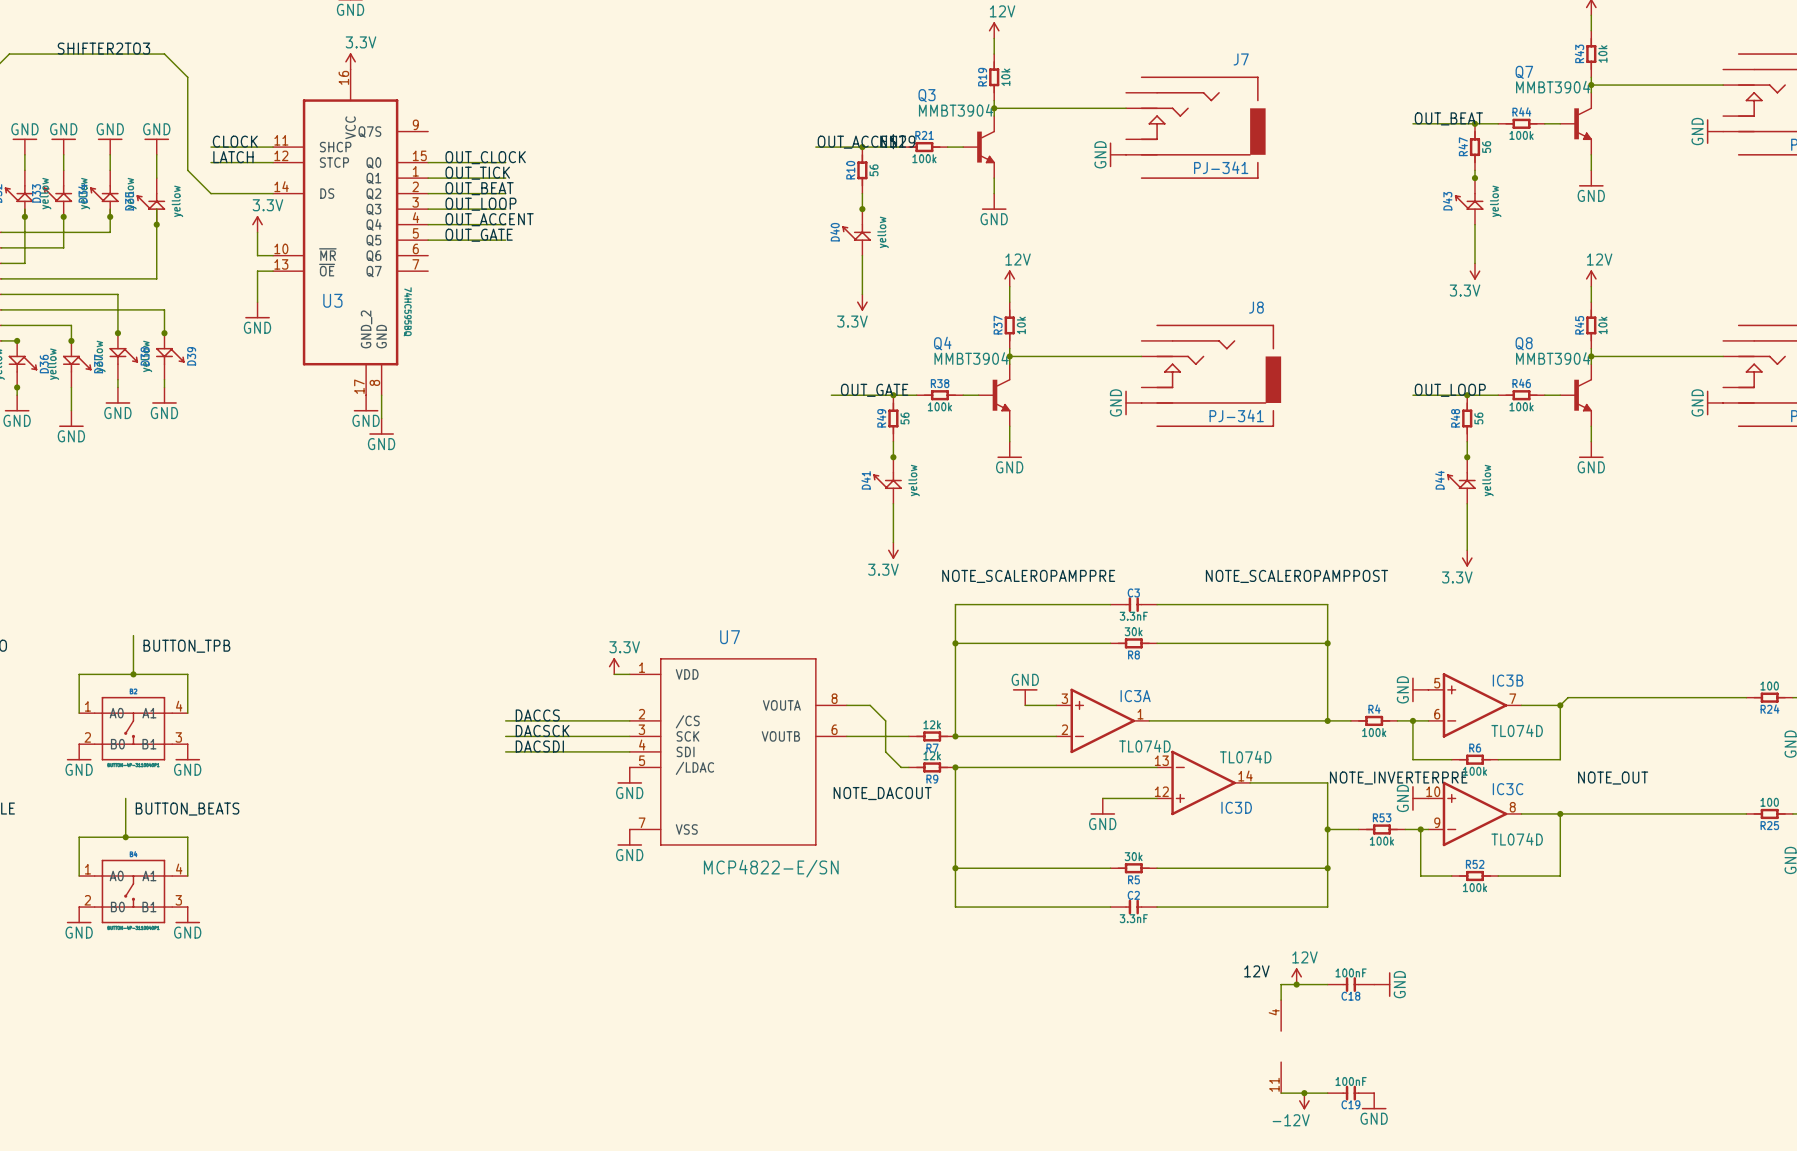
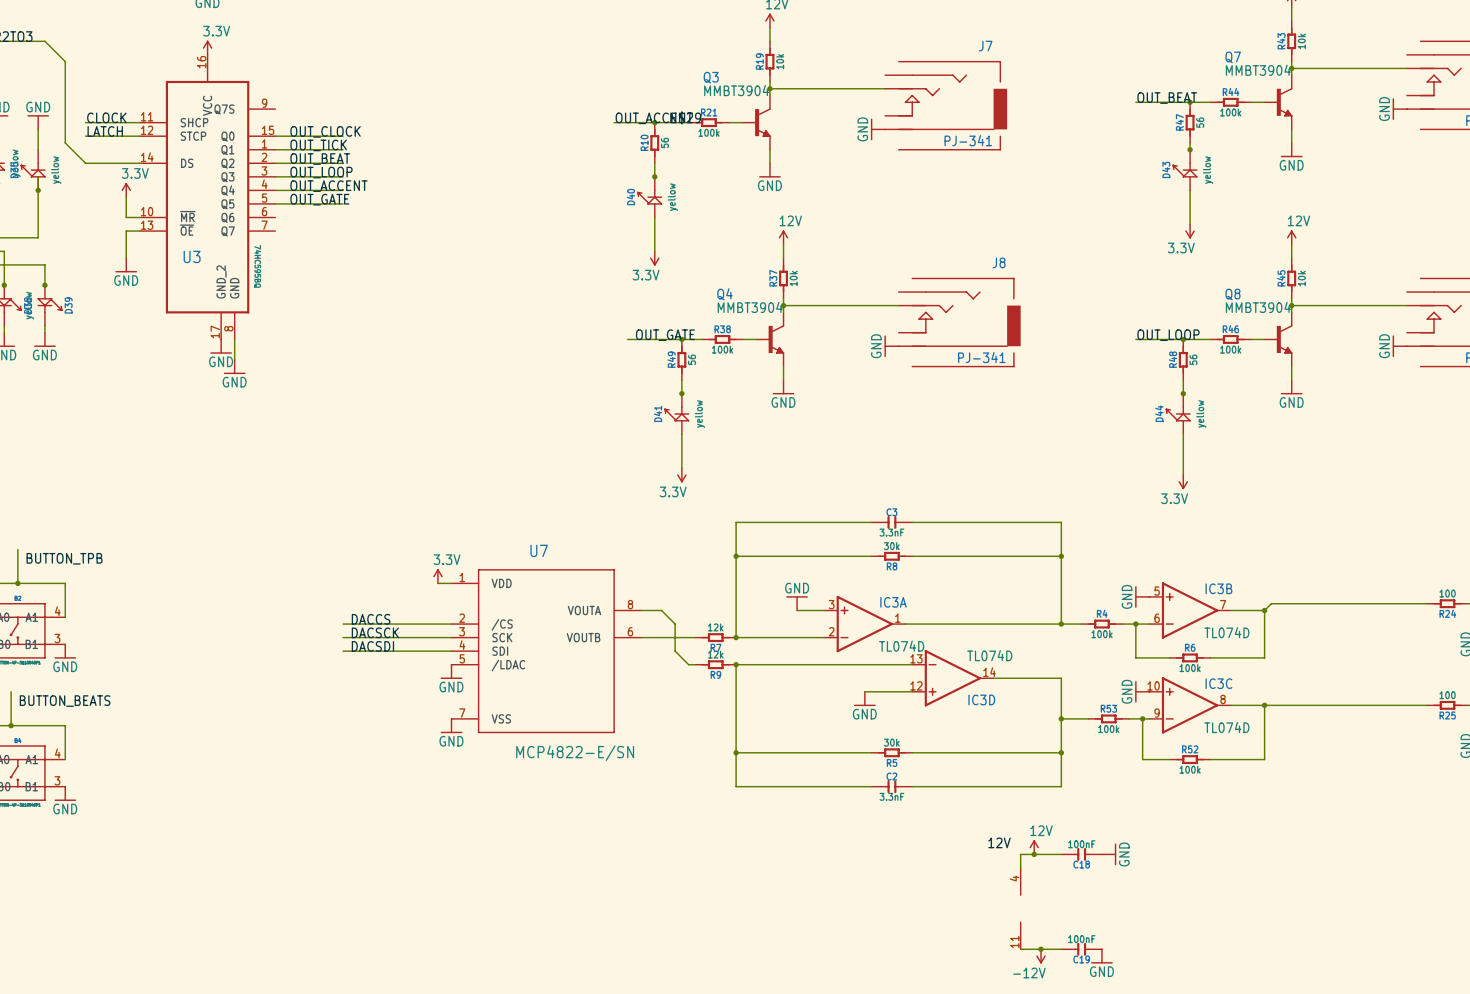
label: NOTE_SCALEROPAMPPRE (1028, 576) -> none
label: NOTE_SCALEROPAMPPOST (1296, 576) -> none
label: NOTE_INVERTERPRE (1398, 778) -> none
label: NOTE_OUT (1613, 778) -> none
label: NOTE_DACOUT (882, 793) -> none

